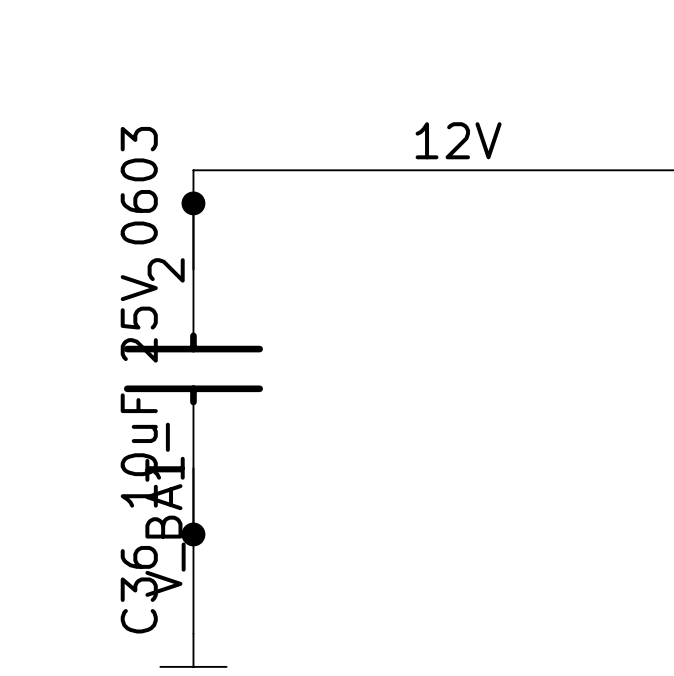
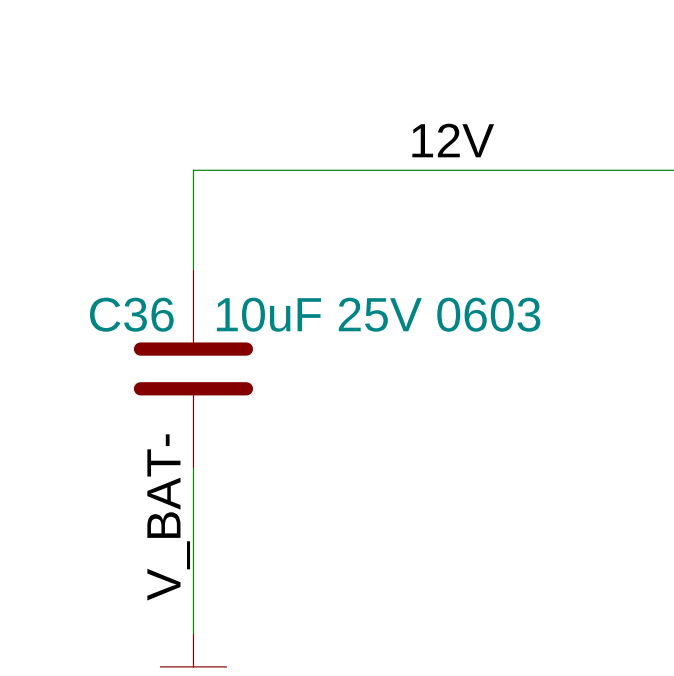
C36 symbol: [123, 203, 263, 535] -> [133, 269, 254, 469]
junction: (193, 203) -> none
C36 value position: 10uF 25V 0603 (139, 317) -> 10uF 25V 0603 (378, 314)
junction: (193, 534) -> none
C36 name position: C36 (139, 589) -> C36 (131, 314)

